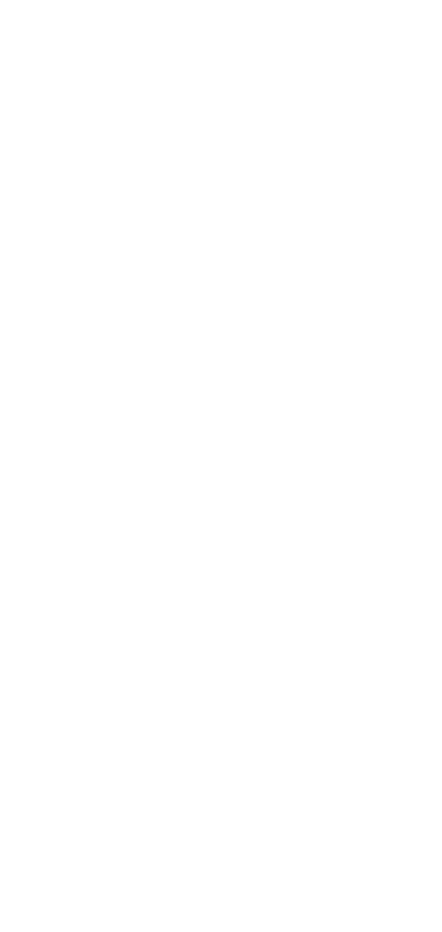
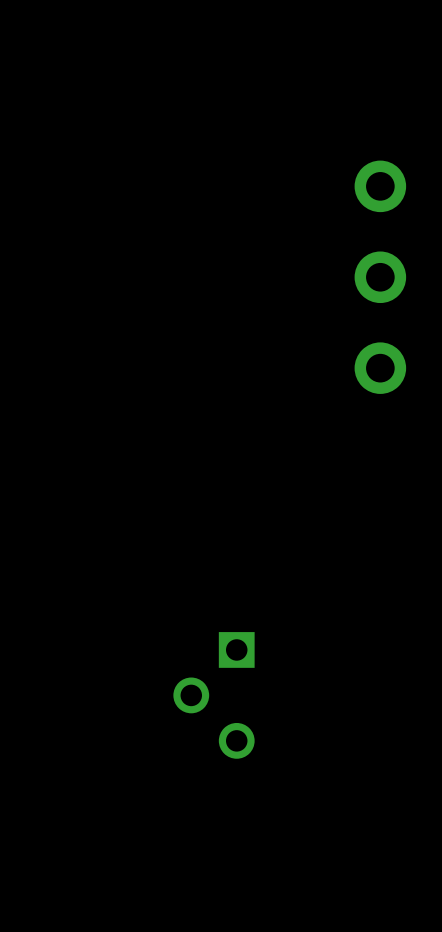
part: none -> (380, 277)
part: none -> (214, 695)

